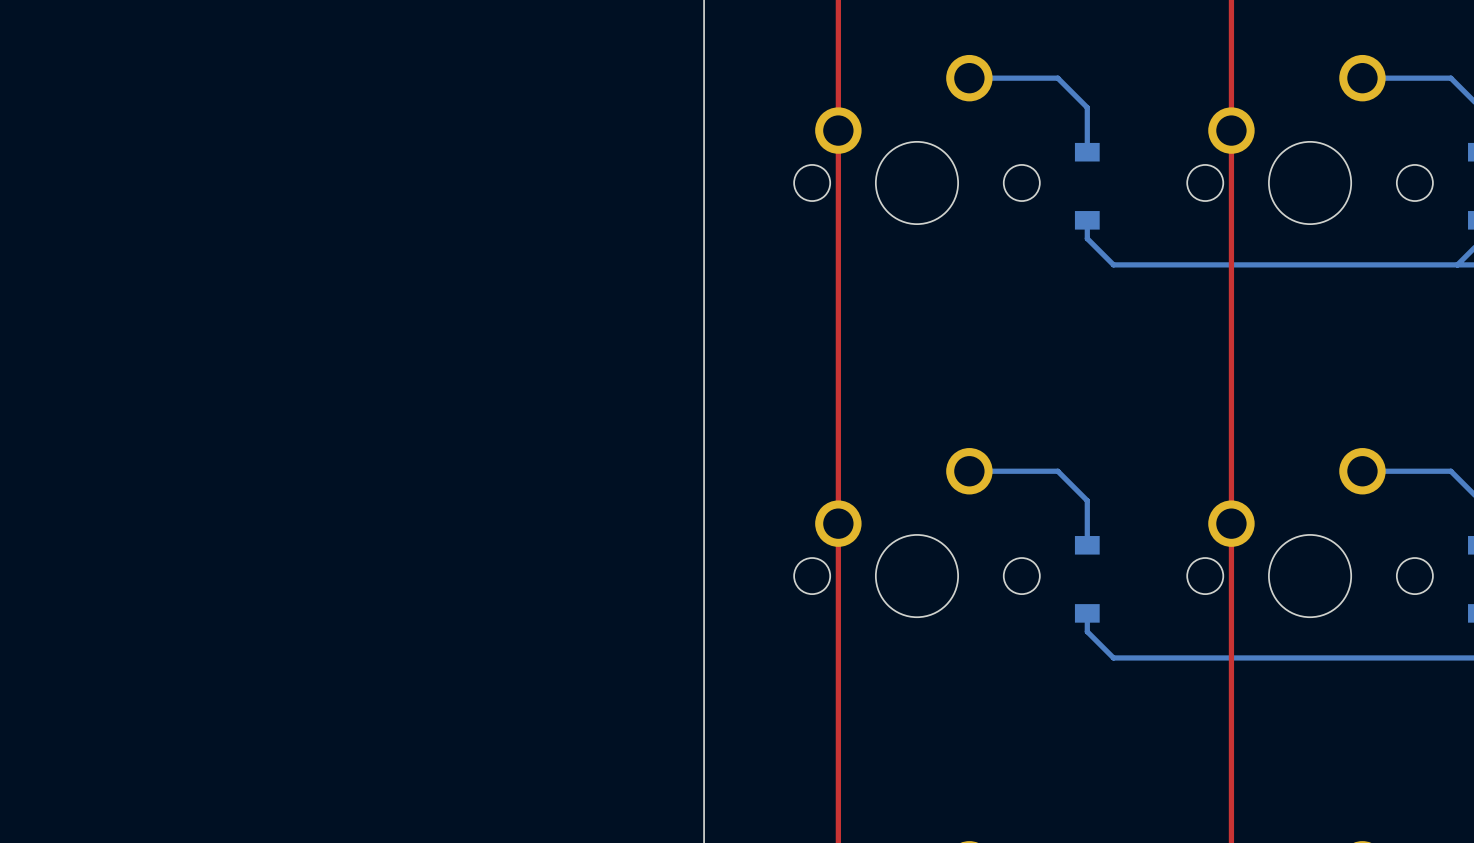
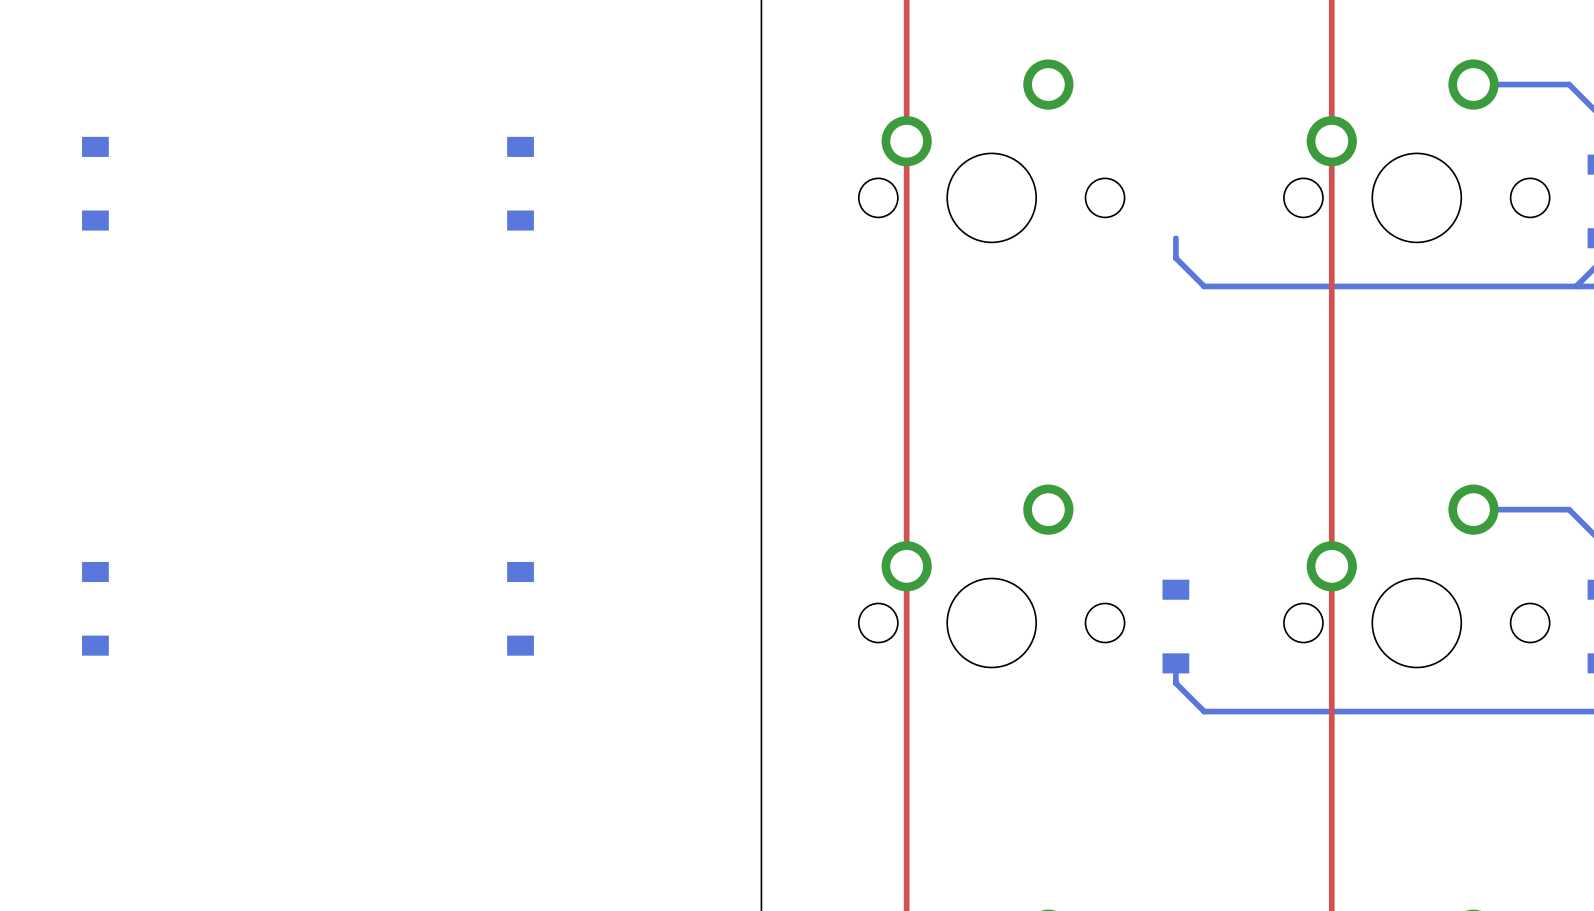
bottom track: (969, 78) (1057, 78) (1087, 107) (1087, 152) -> none
part: none -> (95, 183)
part: none -> (520, 183)
part: (1087, 186) -> none
bottom track: (969, 471) (1057, 471) (1087, 500) (1087, 545) -> none
part: none -> (95, 608)
part: none -> (520, 608)

